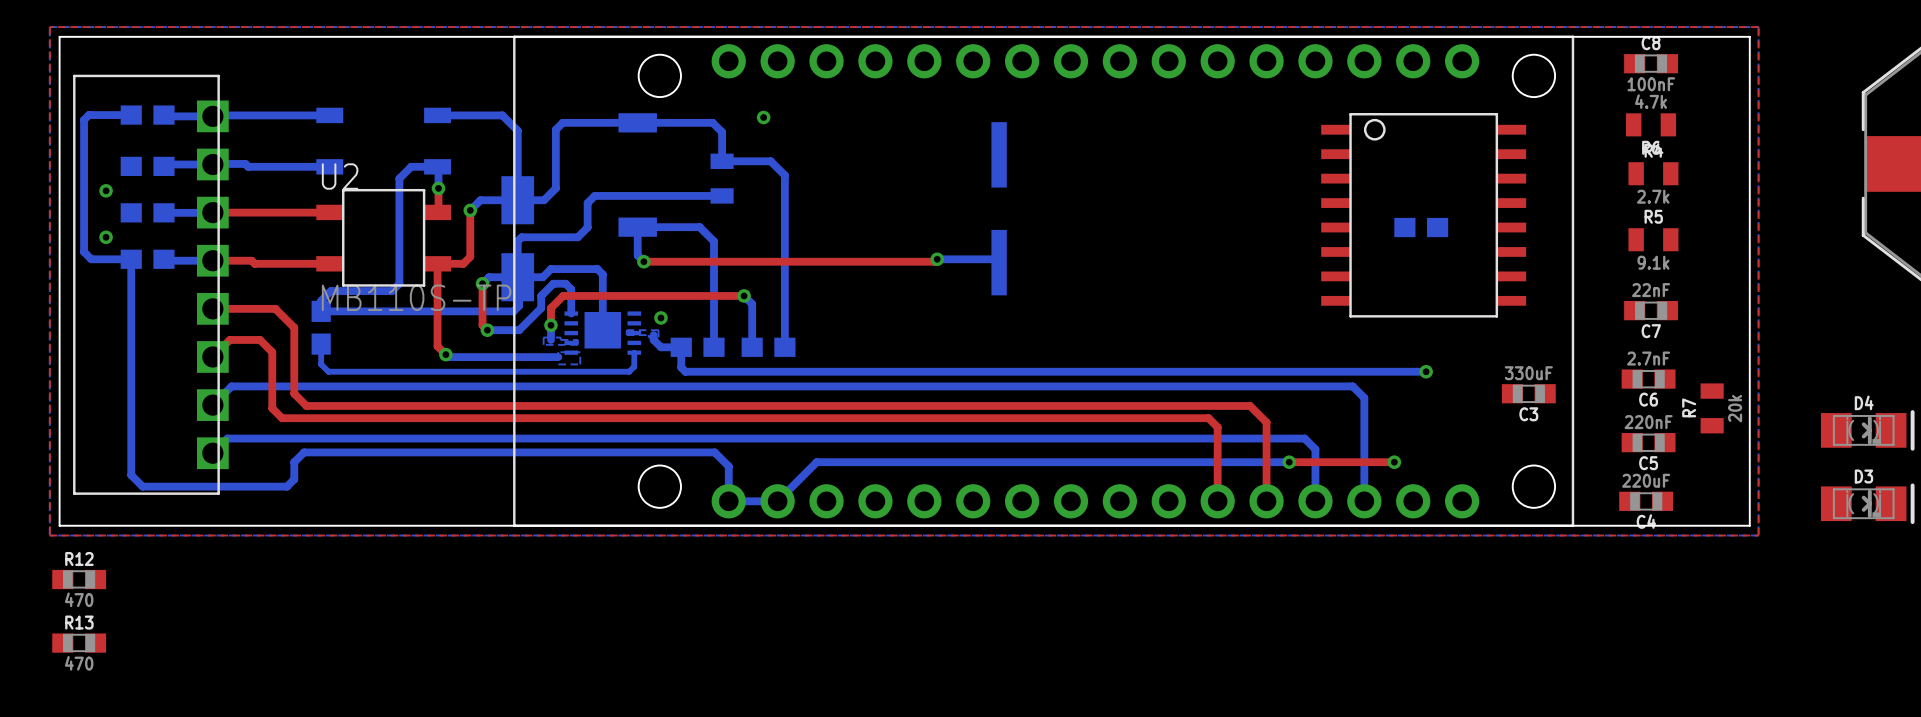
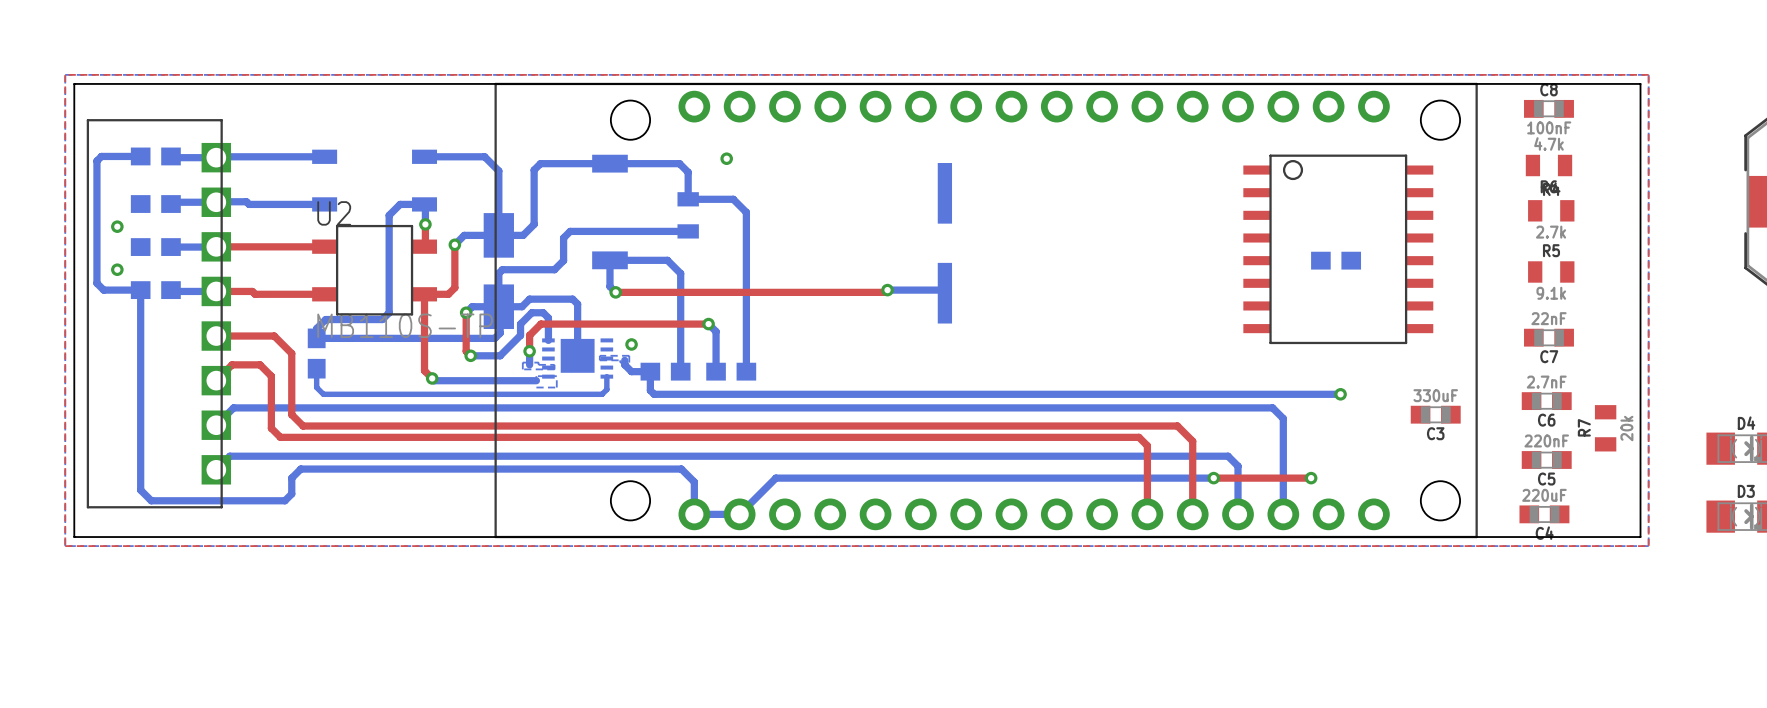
R12: 470 (79, 579) -> none
R13: 470 (79, 643) -> none

